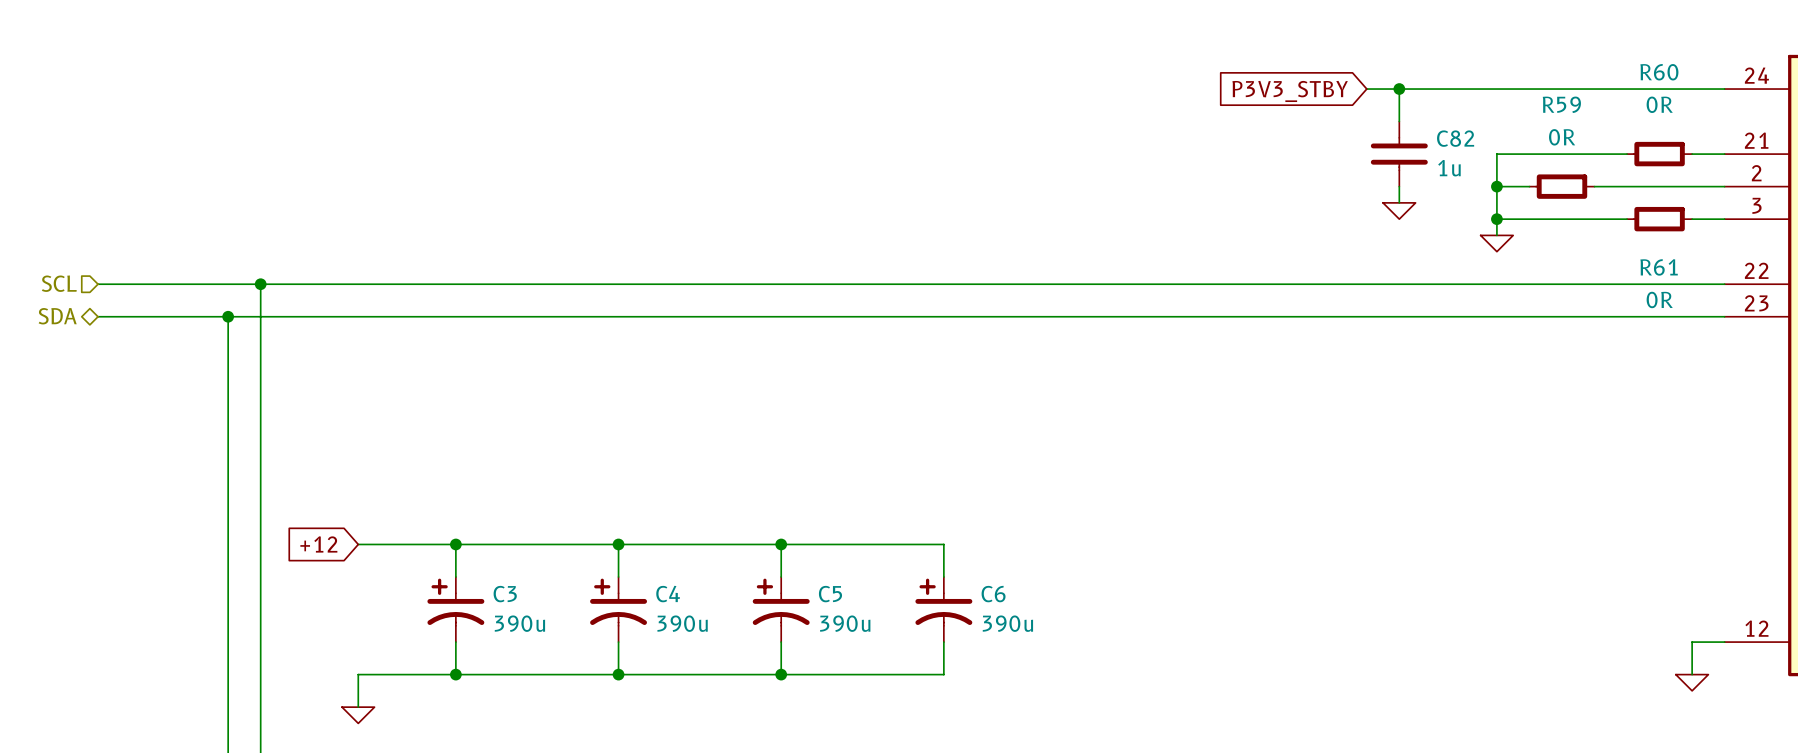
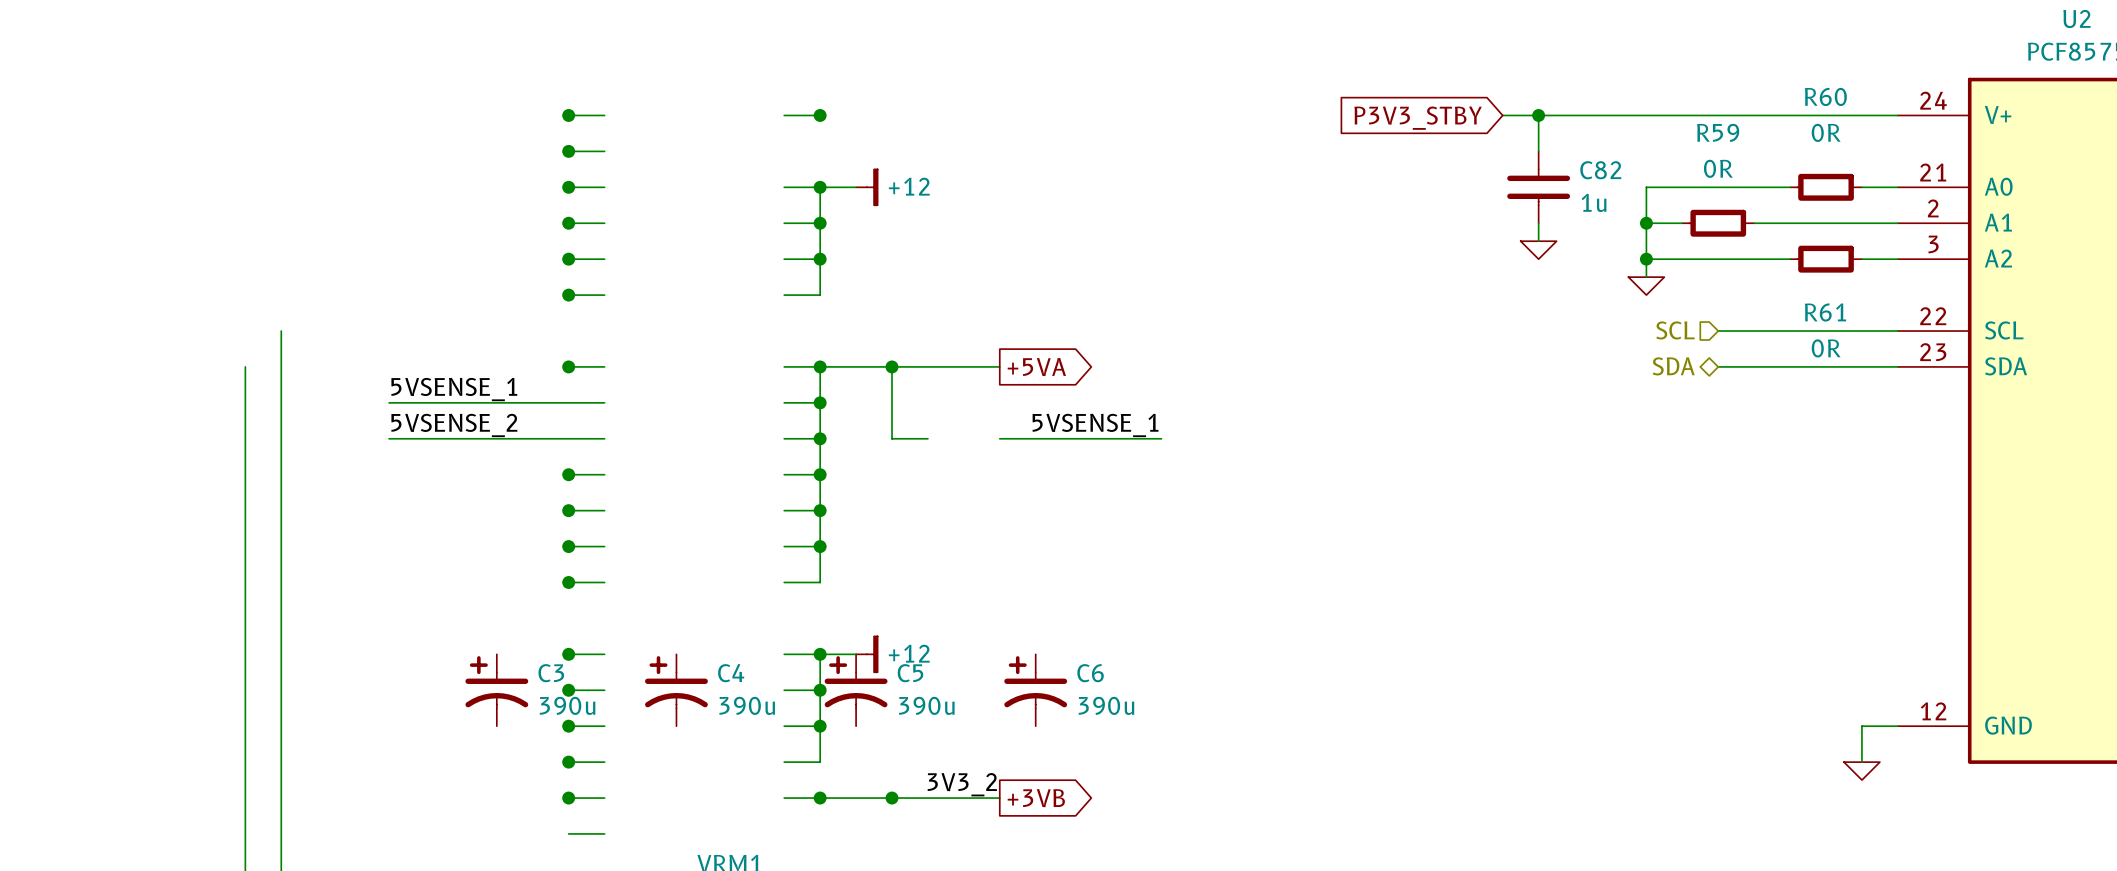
wire: none -> (568, 115) (604, 115)
junction: none -> (568, 115)
wire: none -> (784, 115) (820, 115)
junction: none -> (820, 115)
wire: none -> (568, 151) (604, 151)
junction: none -> (568, 151)
wire: none -> (568, 187) (604, 187)
junction: none -> (568, 187)
wire: none -> (784, 187) (856, 187)
wire: none -> (820, 187) (820, 295) (784, 295)
junction: none -> (820, 187)
power symbol: none -> +12 (866, 187)
wire: none -> (568, 223) (604, 223)
junction: none -> (568, 223)
wire: none -> (784, 223) (820, 223)
junction: none -> (820, 223)
wire: none -> (568, 259) (604, 259)
junction: none -> (568, 259)
wire: none -> (784, 259) (820, 259)
junction: none -> (820, 259)
wire: none -> (568, 295) (604, 295)
junction: none -> (568, 295)
hierarchical label: SCL (59, 283) -> none
hierarchical label: none -> SCL (1675, 330)
wire: (98, 284) (1561, 284) -> none
junction: (260, 284) -> none
hierarchical label: SDA (57, 316) -> none
wire: (98, 316) (520, 316) -> none
junction: (228, 316) -> none
junction: none -> (568, 366)
wire: (553, 316) (716, 316) -> none
wire: none -> (820, 366) (820, 582) (784, 582)
junction: none -> (820, 366)
wire: none -> (892, 366) (892, 438) (927, 438)
junction: none -> (892, 366)
wire: (911, 316) (1561, 316) -> none
global label: none -> +5VA (1036, 367)
hierarchical label: none -> SDA (1673, 366)
label: none -> 5VSENSE_1 (454, 389)
wire: none -> (389, 402) (604, 402)
wire: none -> (784, 402) (820, 402)
junction: none -> (820, 402)
label: none -> 5VSENSE_2 (454, 425)
label: none -> 5VSENSE_1 (1095, 425)
wire: none -> (389, 438) (604, 438)
wire: none -> (784, 438) (820, 438)
junction: none -> (820, 438)
wire: none -> (999, 438) (1161, 438)
wire: none -> (568, 474) (604, 474)
junction: none -> (568, 474)
wire: none -> (784, 474) (820, 474)
junction: none -> (820, 474)
wire: none -> (568, 510) (604, 510)
junction: none -> (568, 510)
wire: none -> (784, 510) (820, 510)
junction: none -> (820, 510)
wire: none -> (568, 546) (604, 546)
junction: none -> (568, 546)
wire: none -> (784, 546) (820, 546)
junction: none -> (820, 546)
wire: none -> (568, 582) (604, 582)
junction: none -> (568, 582)
global label: +12 (318, 544) -> none
wire: (358, 544) (943, 544) (943, 577) -> none
wire: (455, 544) (455, 577) -> none
junction: (455, 544) -> none
wire: (618, 544) (618, 577) -> none
junction: (618, 544) -> none
wire: (781, 544) (781, 577) -> (784, 654) (856, 654)
junction: (781, 544) -> none
wire: none -> (568, 654) (604, 654)
junction: none -> (568, 654)
junction: none -> (820, 654)
power symbol: none -> +12 (866, 654)
wire: none -> (568, 690) (604, 690)
junction: none -> (568, 690)
wire: none -> (784, 690) (820, 690)
junction: none -> (820, 690)
wire: (455, 642) (455, 674) -> none
wire: none -> (568, 726) (604, 726)
junction: none -> (568, 726)
wire: (618, 642) (618, 674) -> none
wire: none -> (784, 726) (820, 726)
junction: none -> (820, 726)
wire: (781, 642) (781, 674) -> none
wire: (943, 642) (943, 674) (748, 674) -> (820, 654) (820, 762)
junction: (455, 674) -> none
wire: (520, 674) (358, 674) (358, 707) -> none
junction: none -> (568, 762)
wire: (553, 674) (716, 674) -> none
junction: (618, 674) -> none
junction: (781, 674) -> none
label: none -> 3V3_2 (962, 784)
wire: none -> (568, 798) (604, 798)
junction: none -> (568, 798)
wire: none -> (784, 798) (999, 798)
junction: none -> (820, 798)
junction: none -> (892, 798)
global label: none -> +3VB (1036, 798)
power symbol: (358, 715) -> none
wire: none -> (568, 833) (604, 833)

